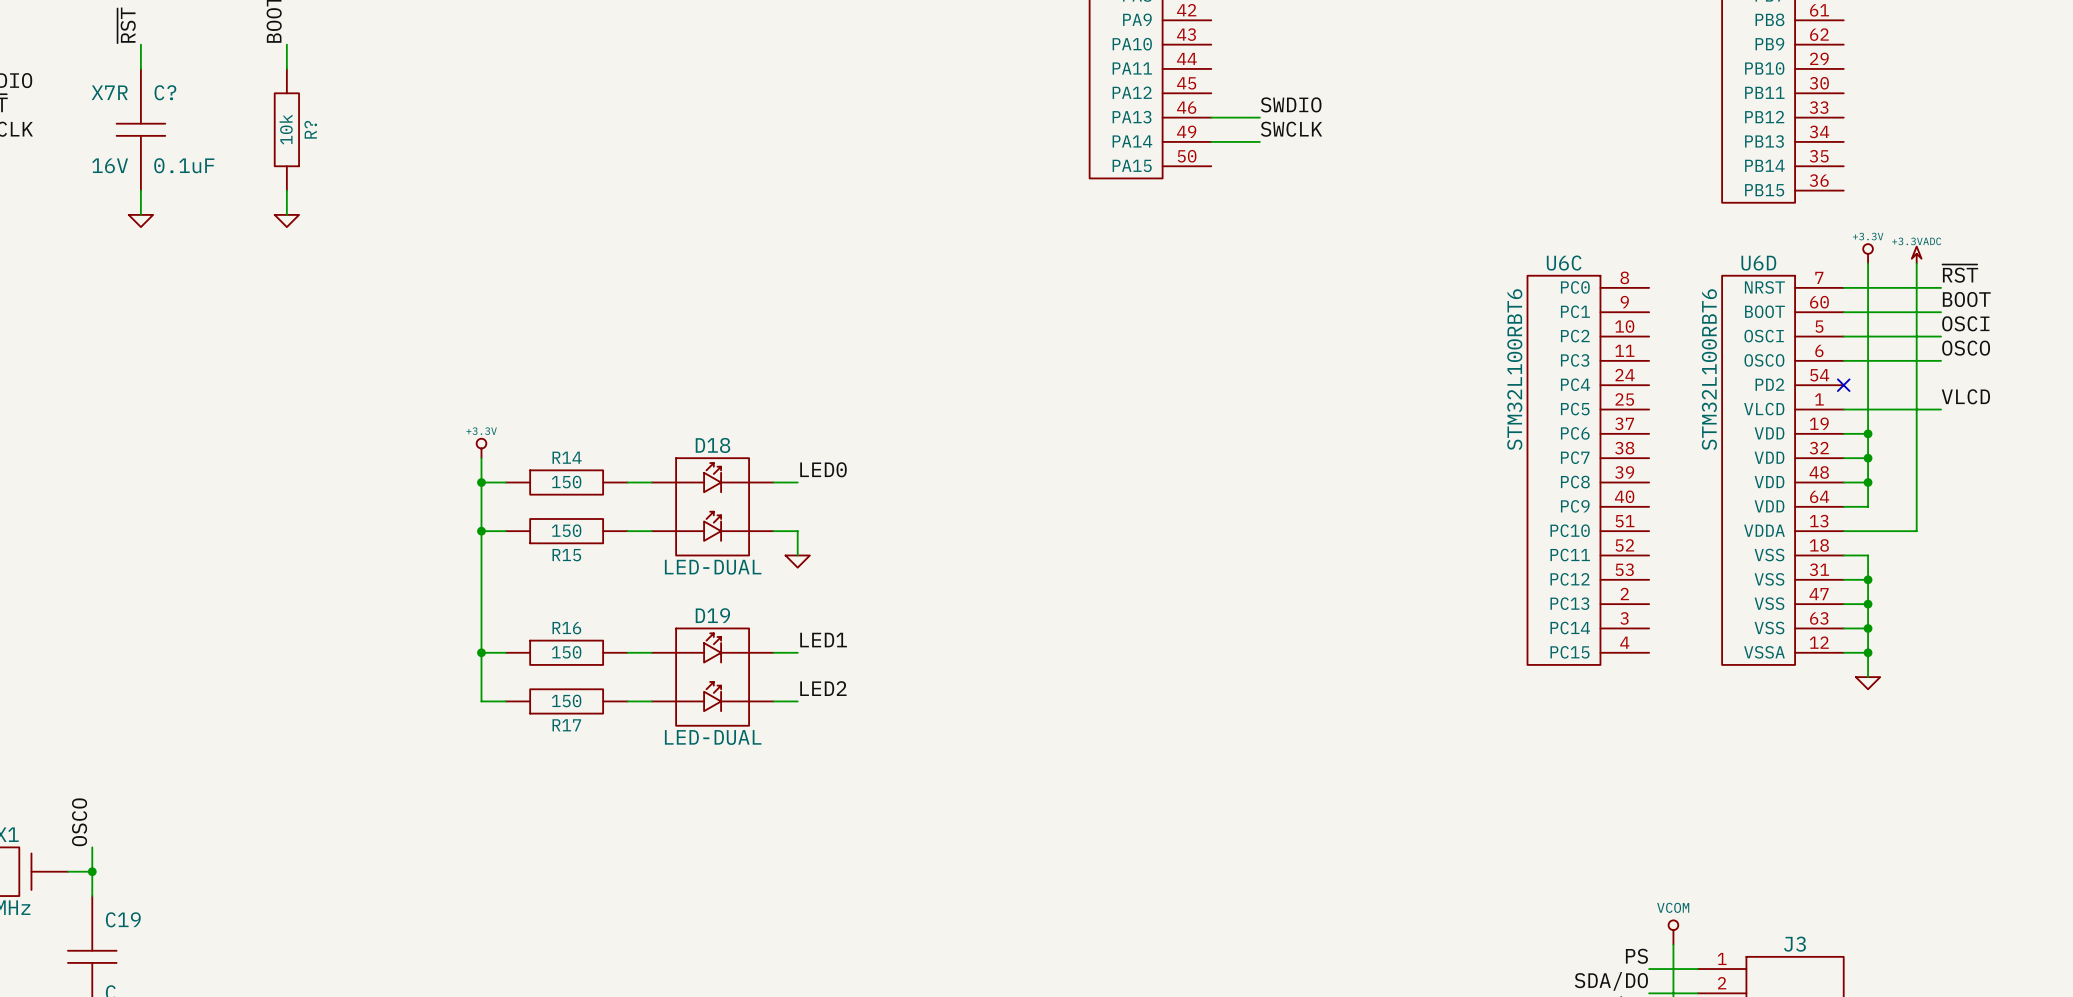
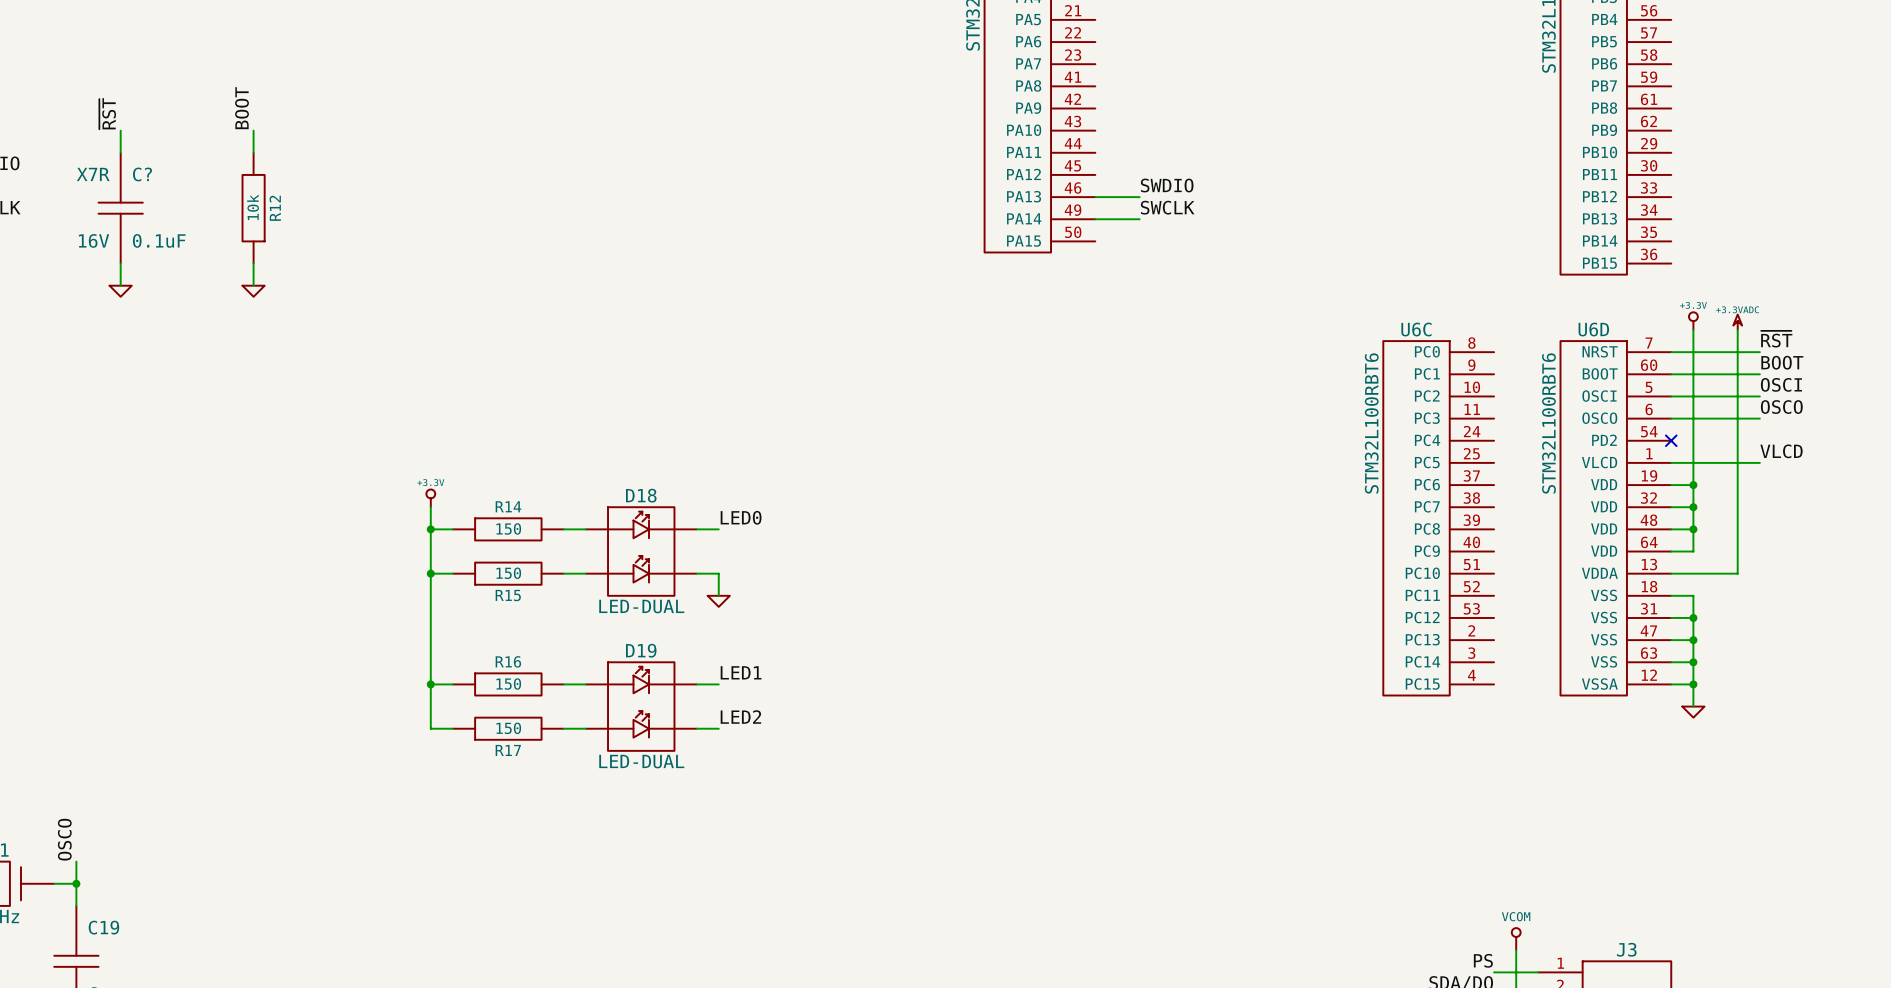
R? name: R? (310, 129) -> R12 (275, 208)

